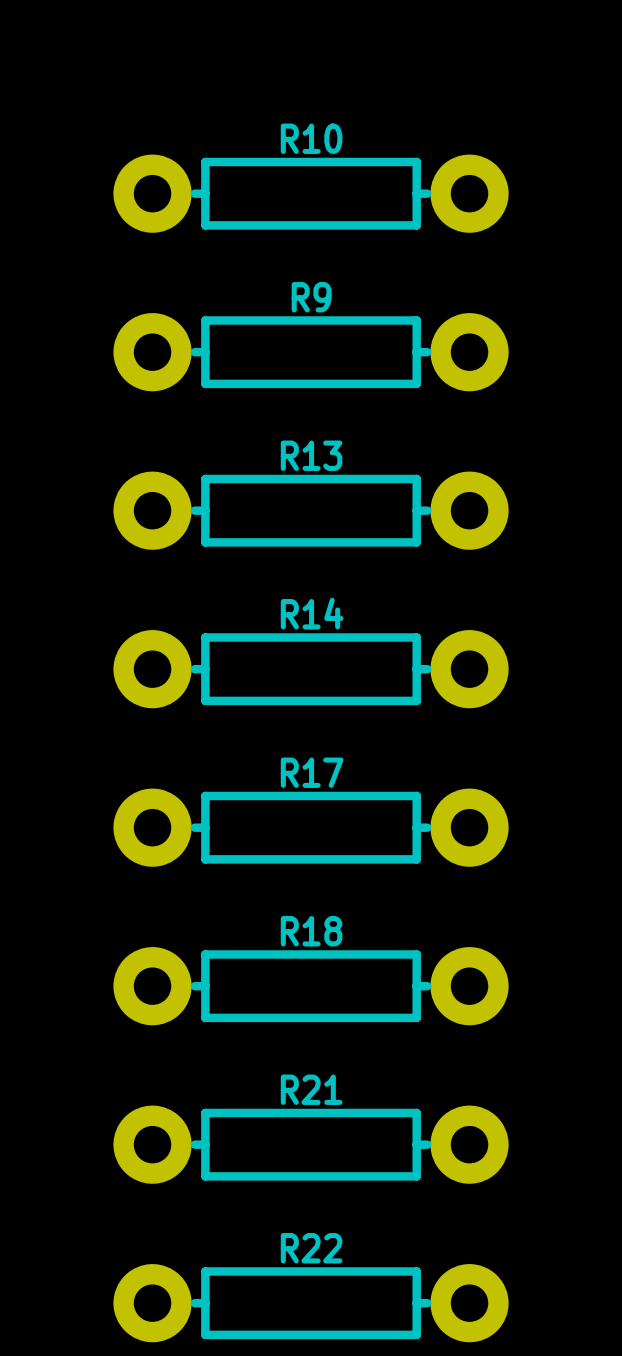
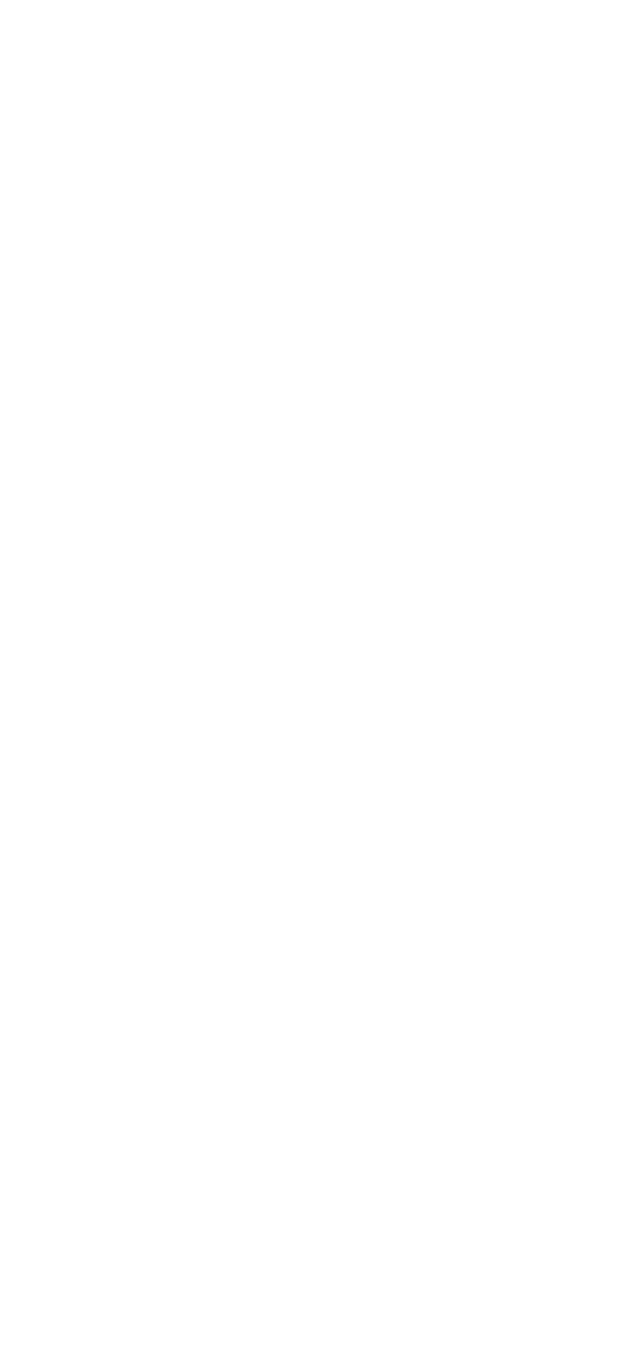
R10: (311, 193) -> none
R9: (311, 352) -> none
R13: (311, 510) -> none
R14: (311, 669) -> none
R17: (311, 827) -> none
R18: (311, 986) -> none
R21: (311, 1144) -> none
R22: (311, 1303) -> none

